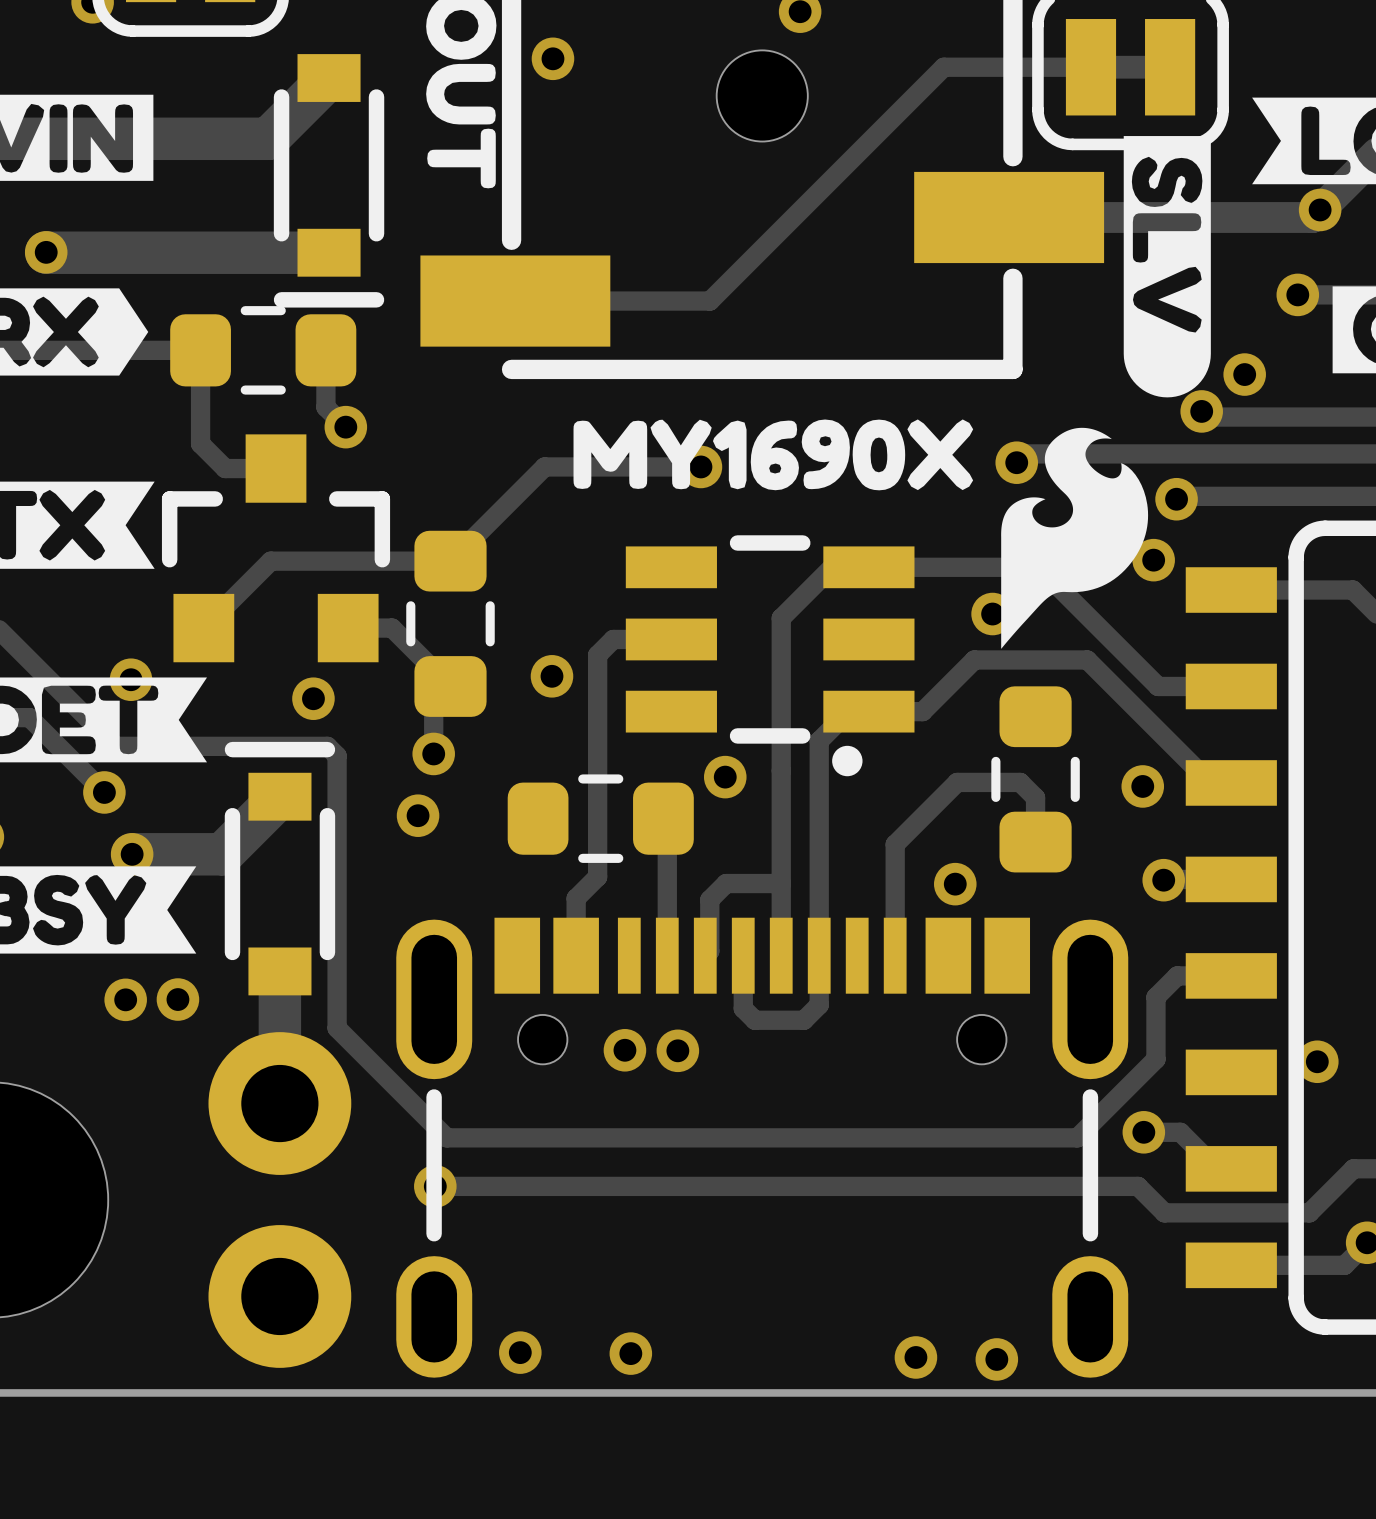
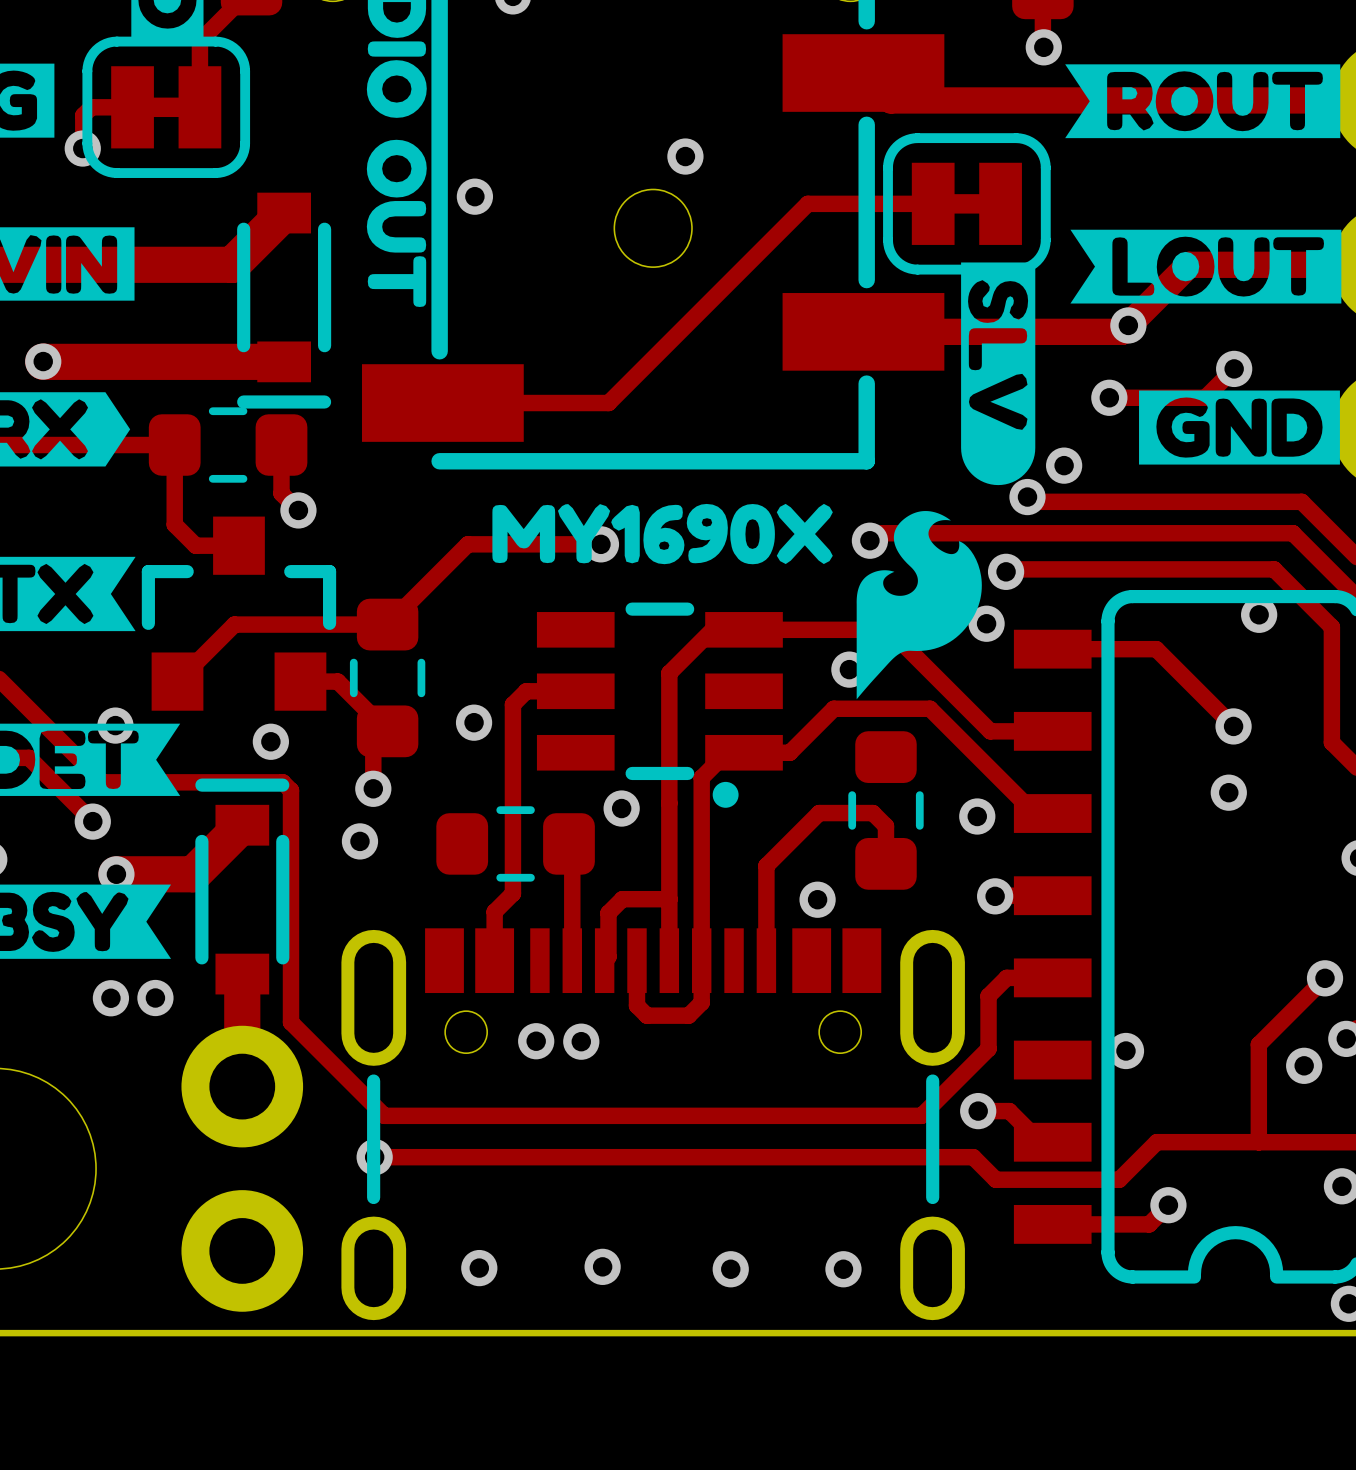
via: none -> (602, 1266)
via: none -> (730, 1269)
via position: (520, 1352) -> (479, 1268)
via: (630, 1353) -> none
via: (915, 1357) -> none
via position: (996, 1359) -> (843, 1269)

